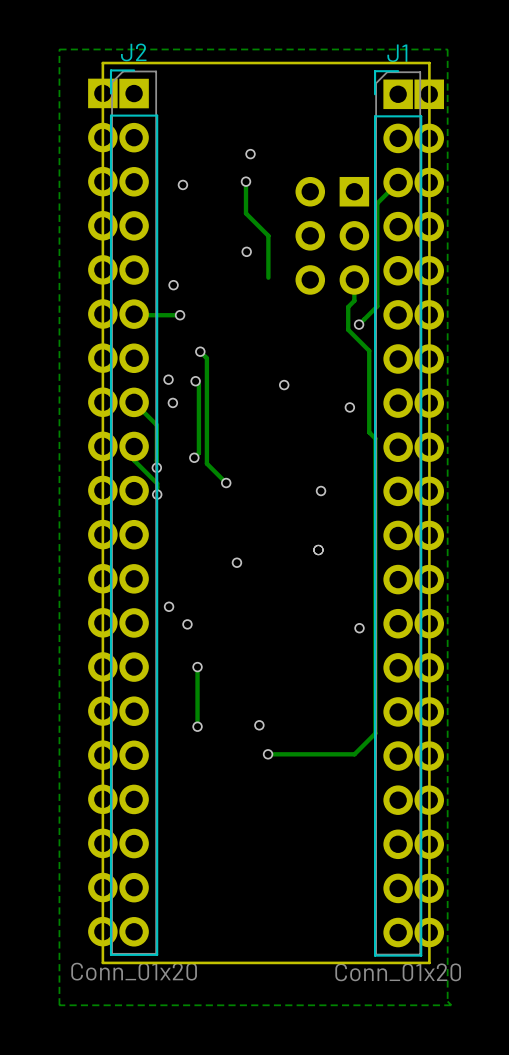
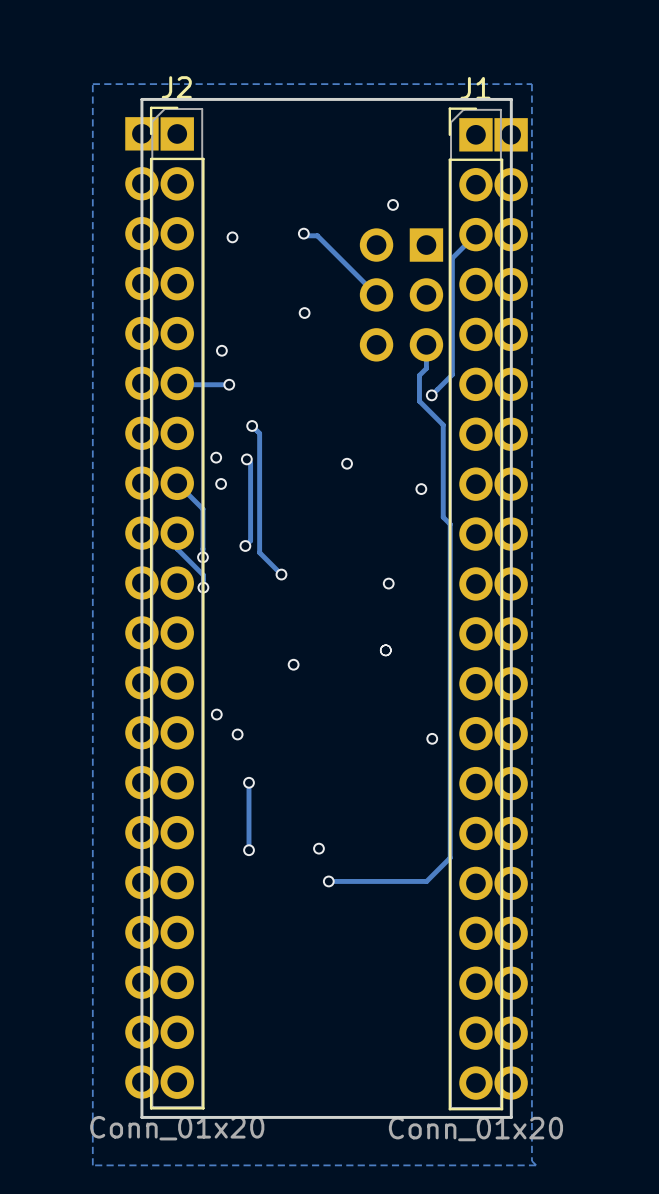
via position: (250, 154) -> (393, 204)
track: (245, 181) (245, 213) (268, 235) (268, 277) -> none
track: none -> (304, 235) (317, 235) (376, 294)

